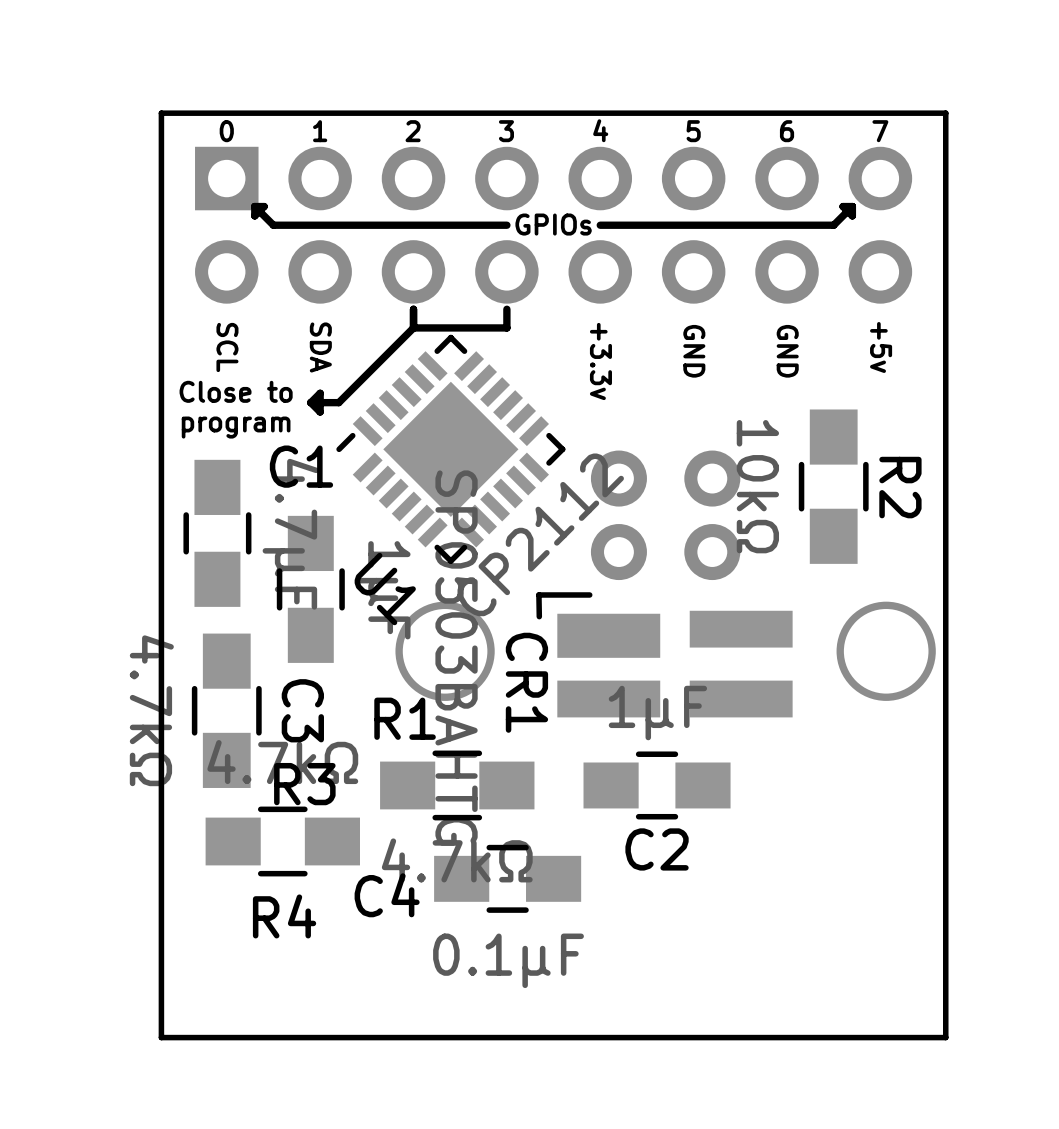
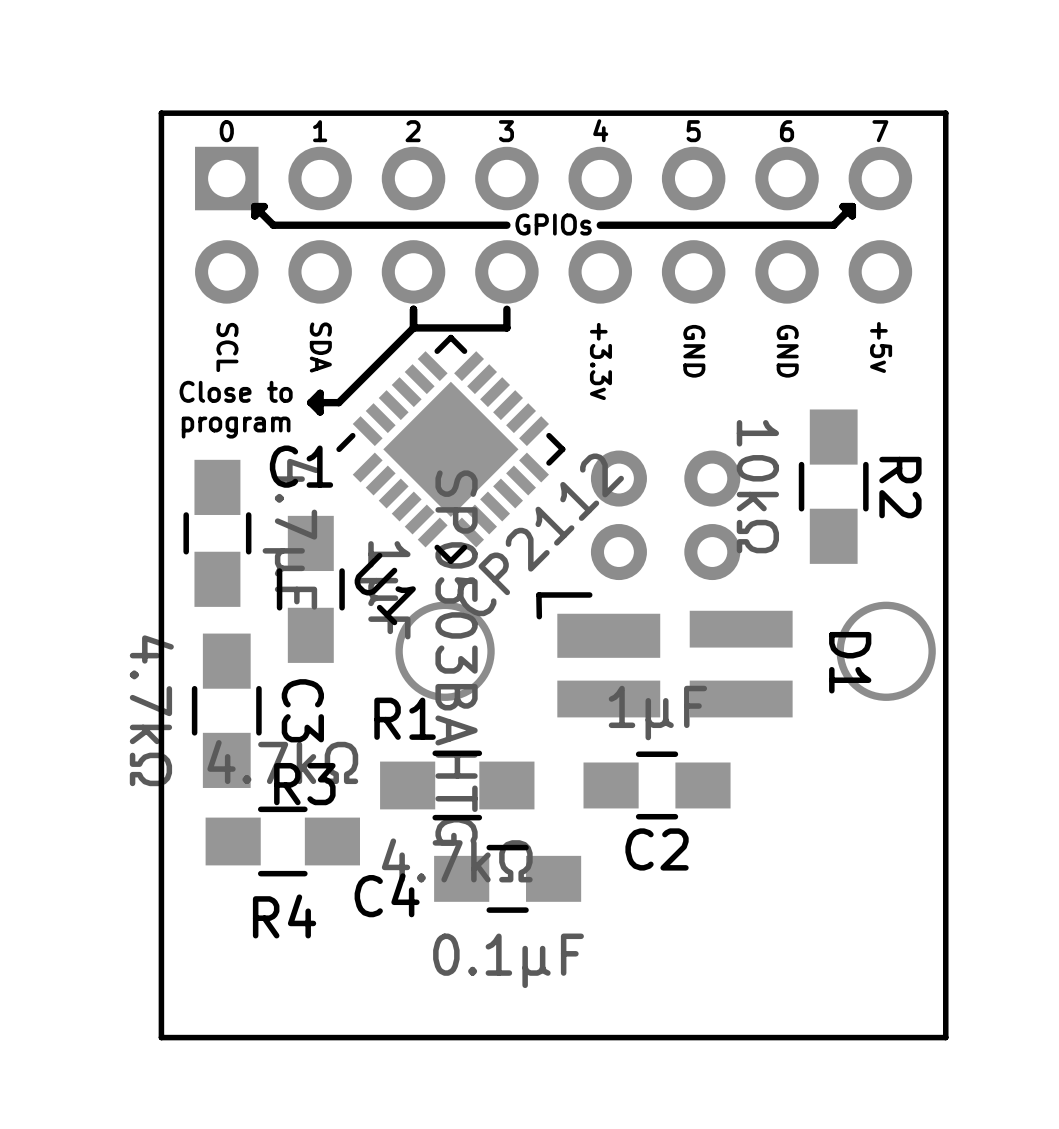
CR1 name: CR1 (526, 682) -> D1 (850, 662)

